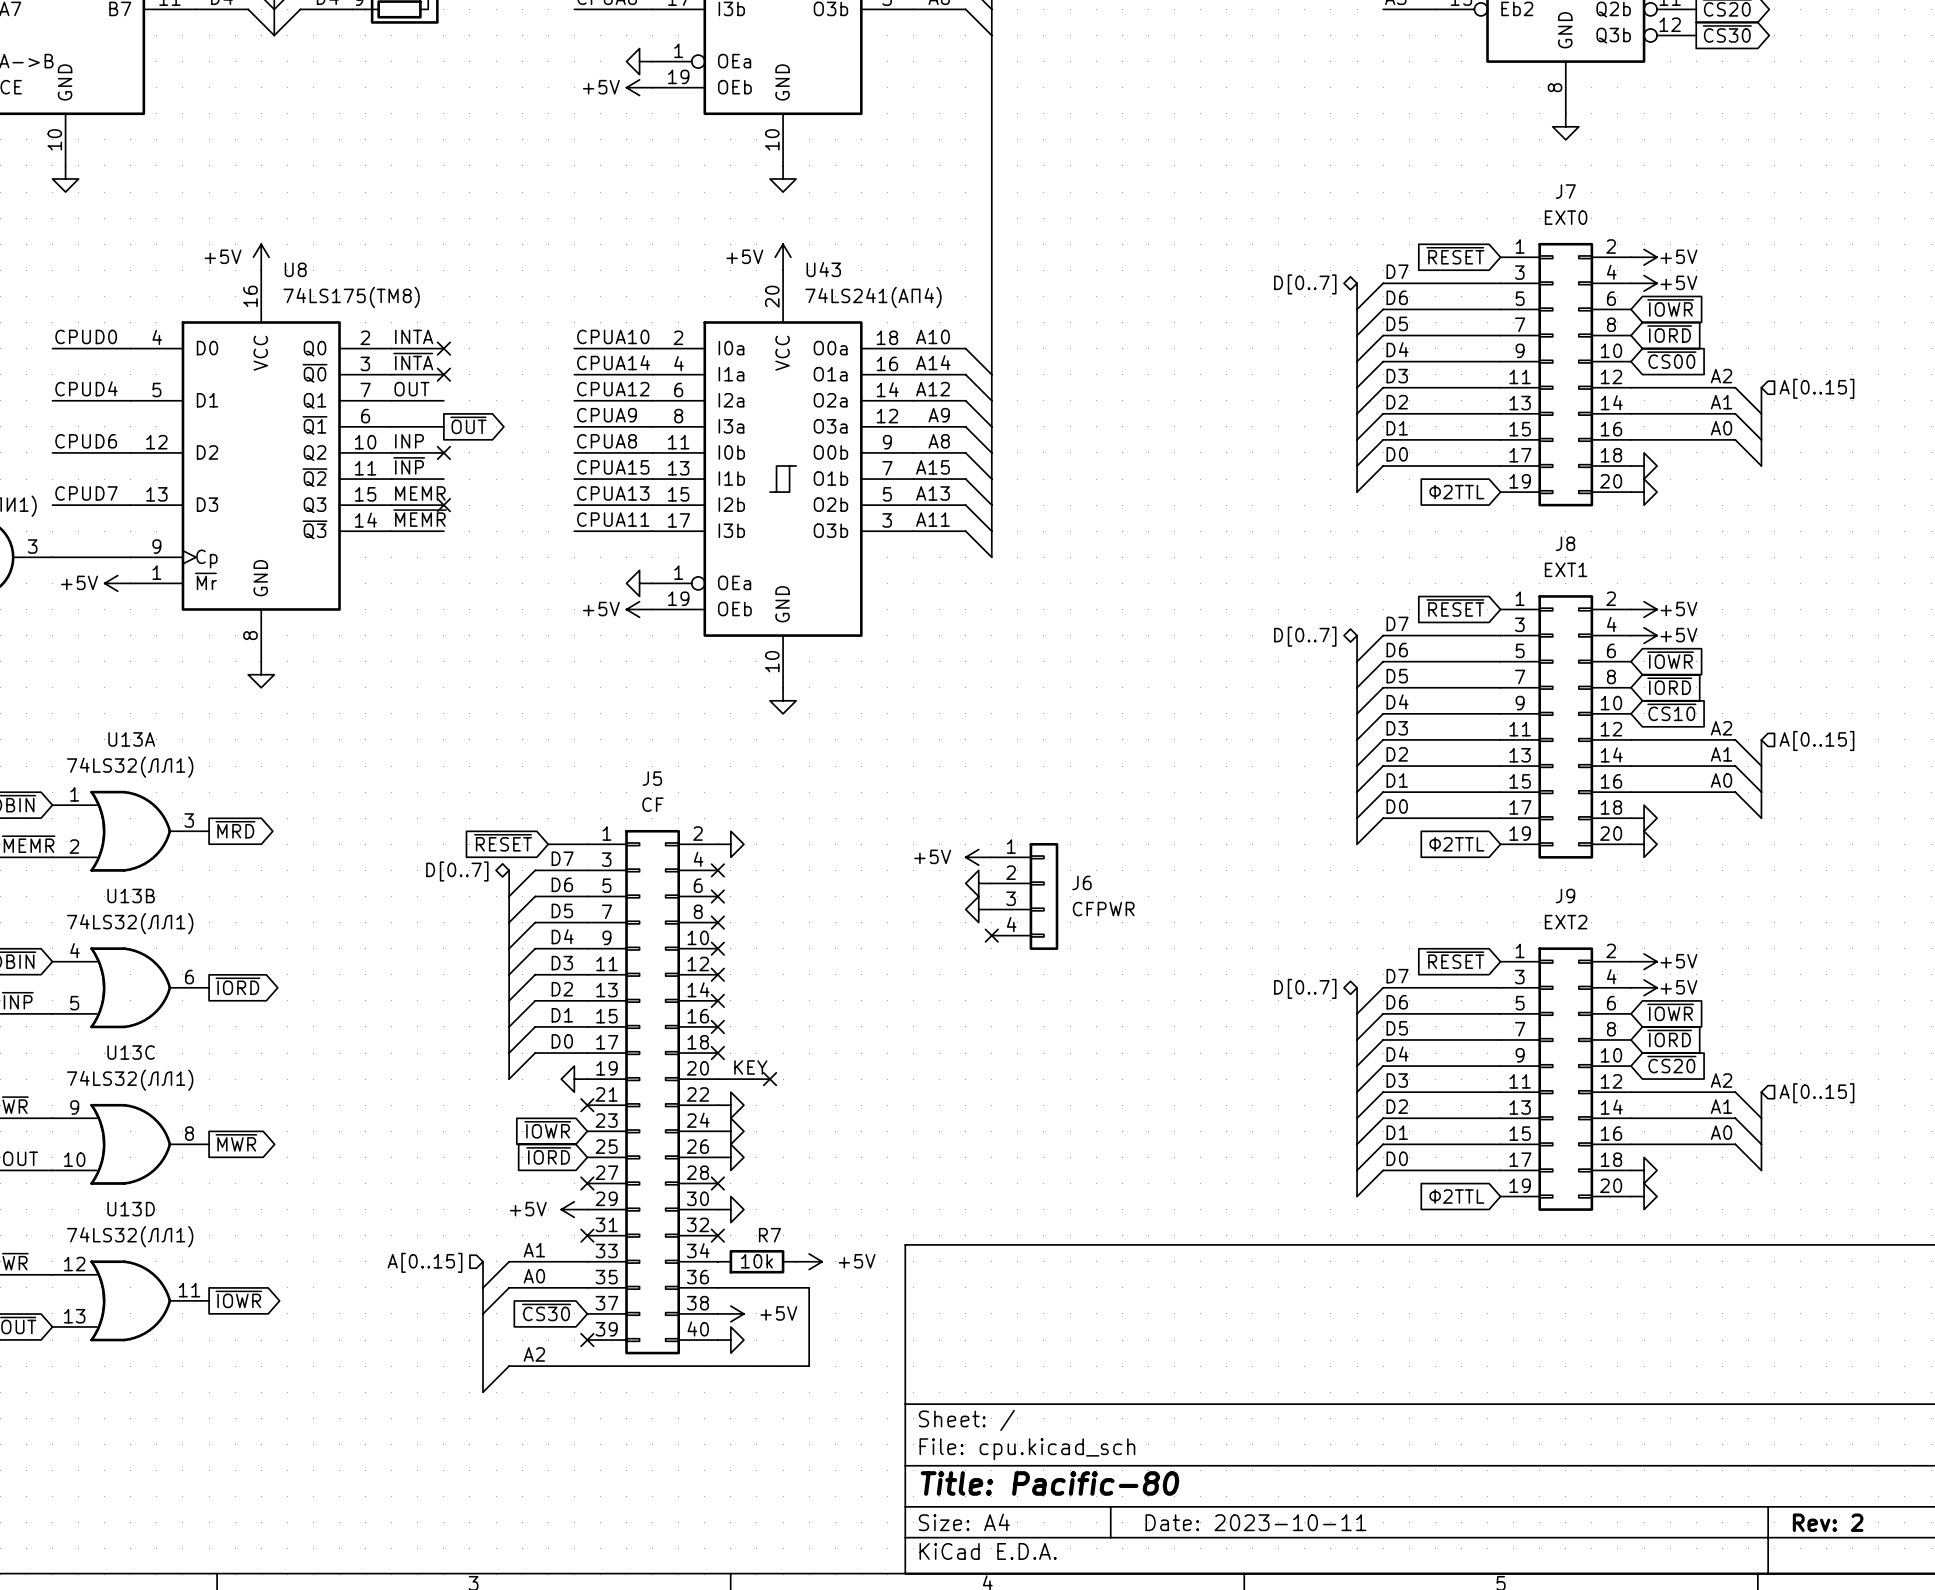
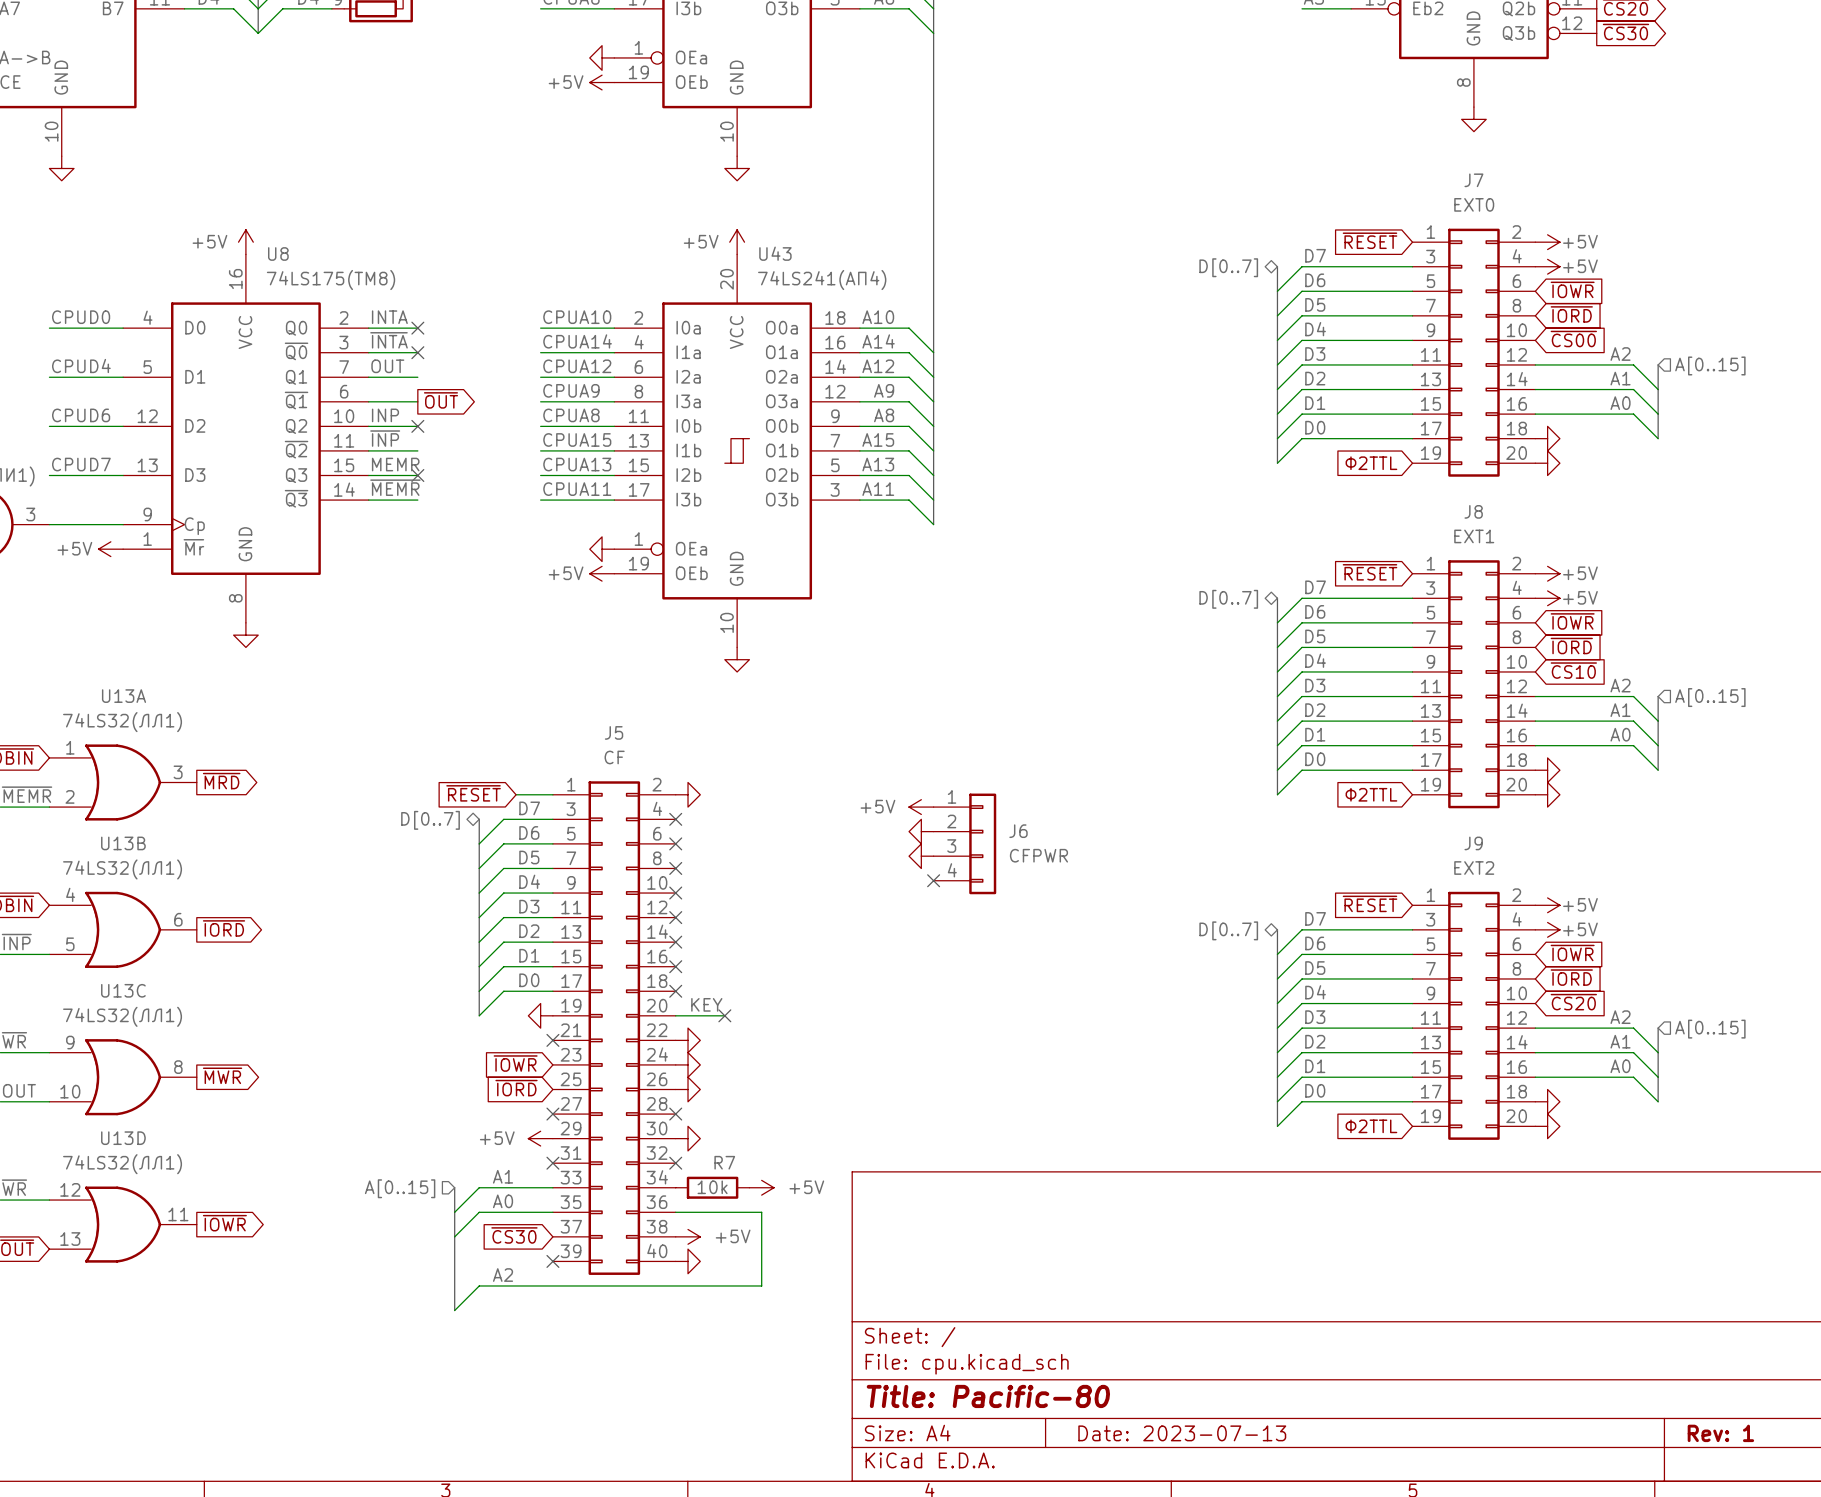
title block: Date: 2023-10-11 (1255, 1522) -> Date: 2023-07-13 (1182, 1433)
title block: Rev: 2 (1828, 1522) -> Rev: 1 (1720, 1433)

